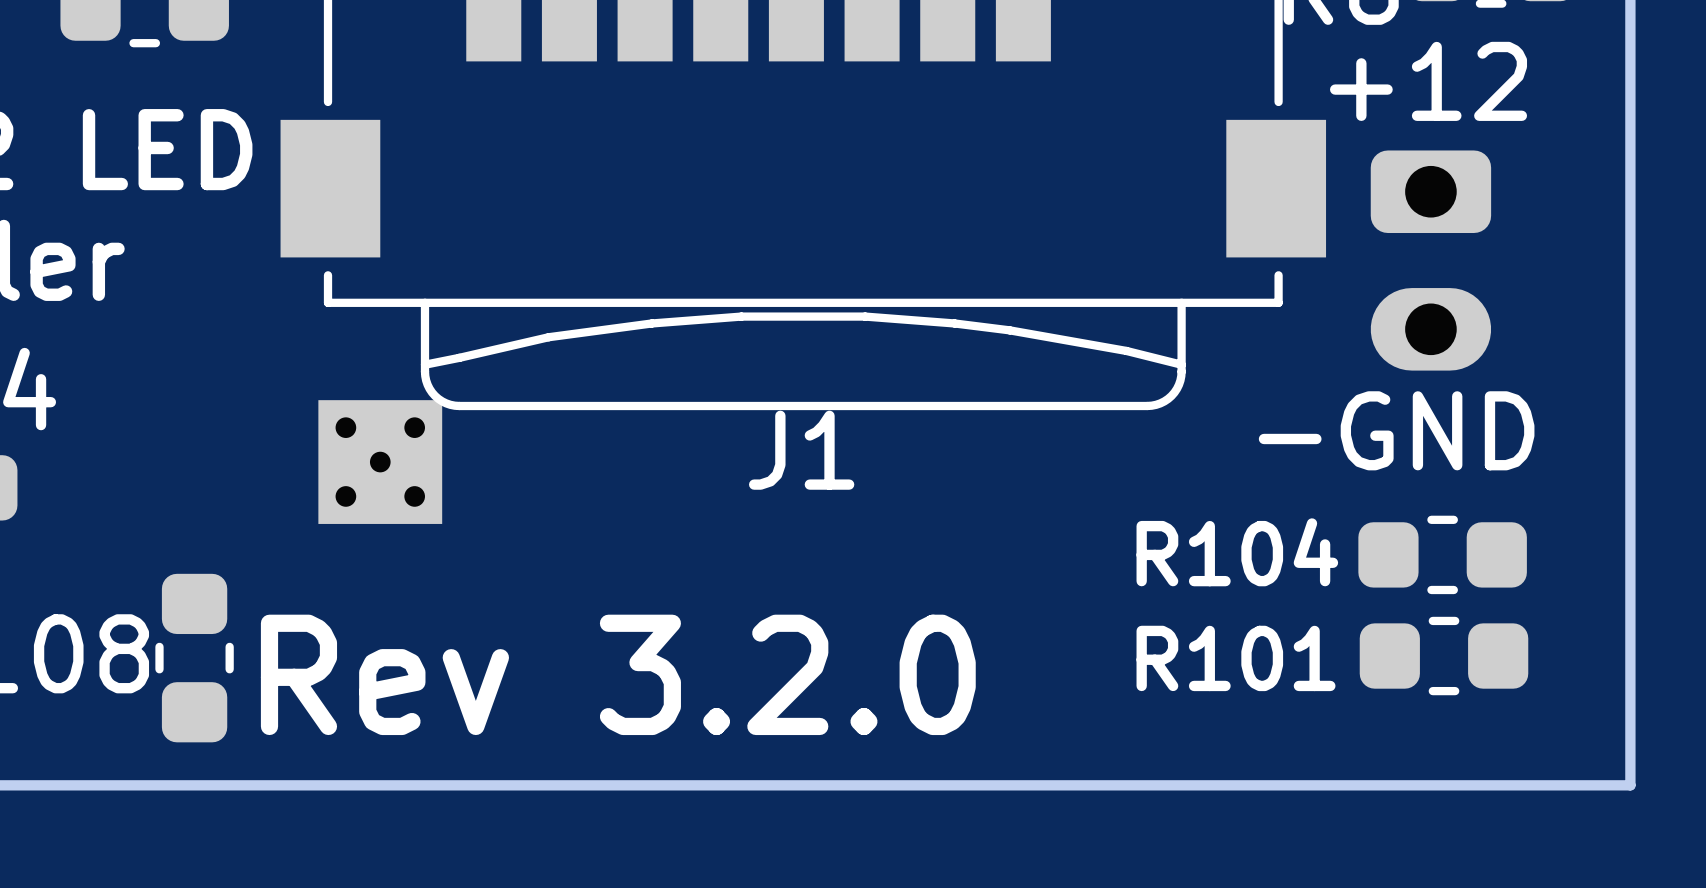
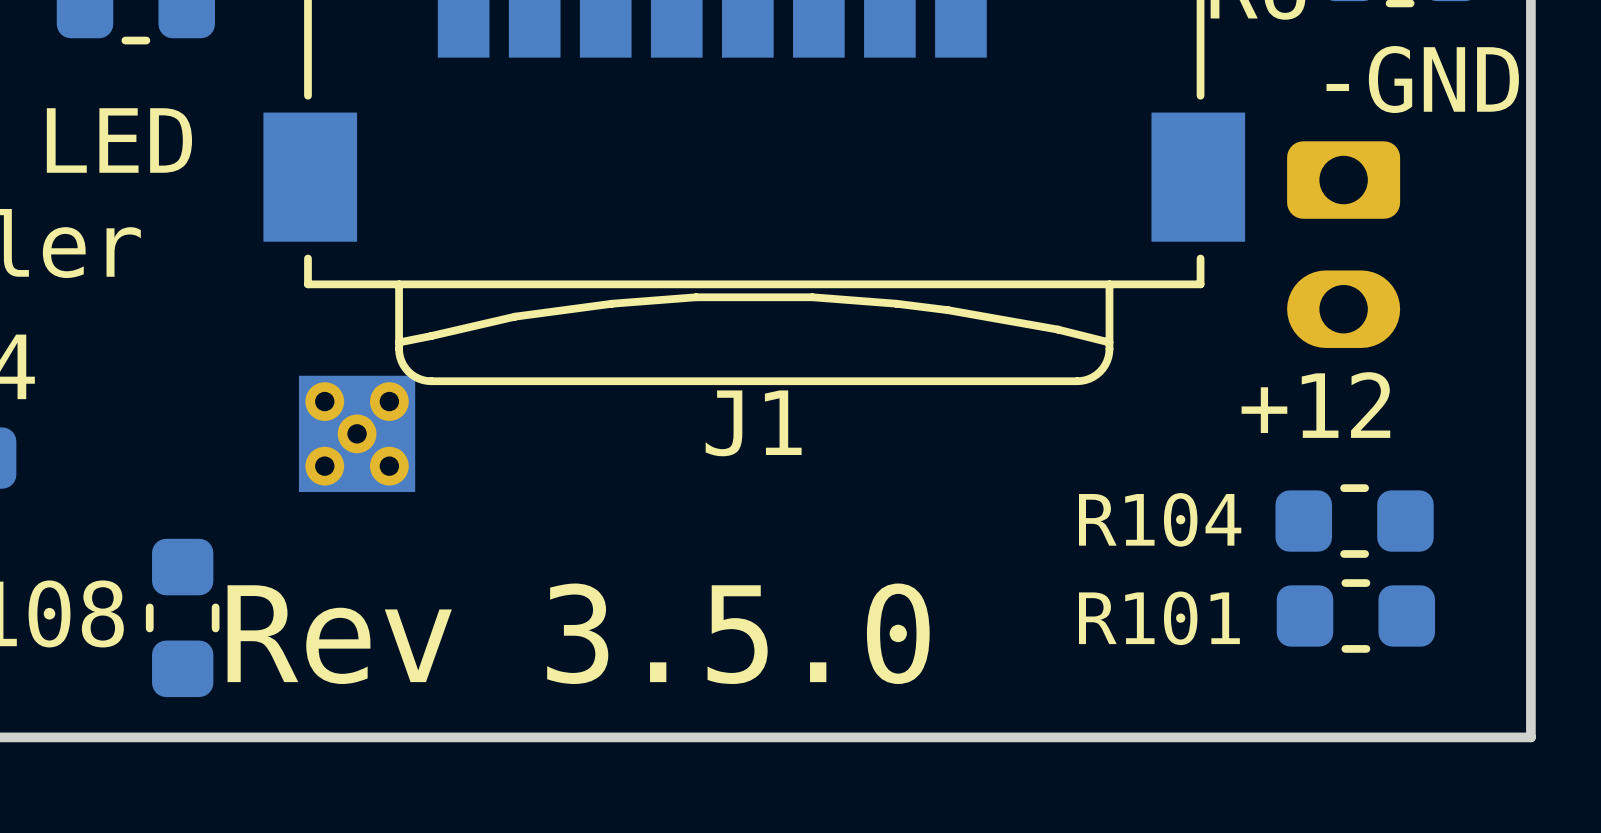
text position: +12 (1428, 81) -> +12 (1315, 405)
text position: -GND (1396, 430) -> -GND (1422, 79)
text: Rev 3.2.0 (618, 674) -> Rev 3.5.0 (578, 633)

